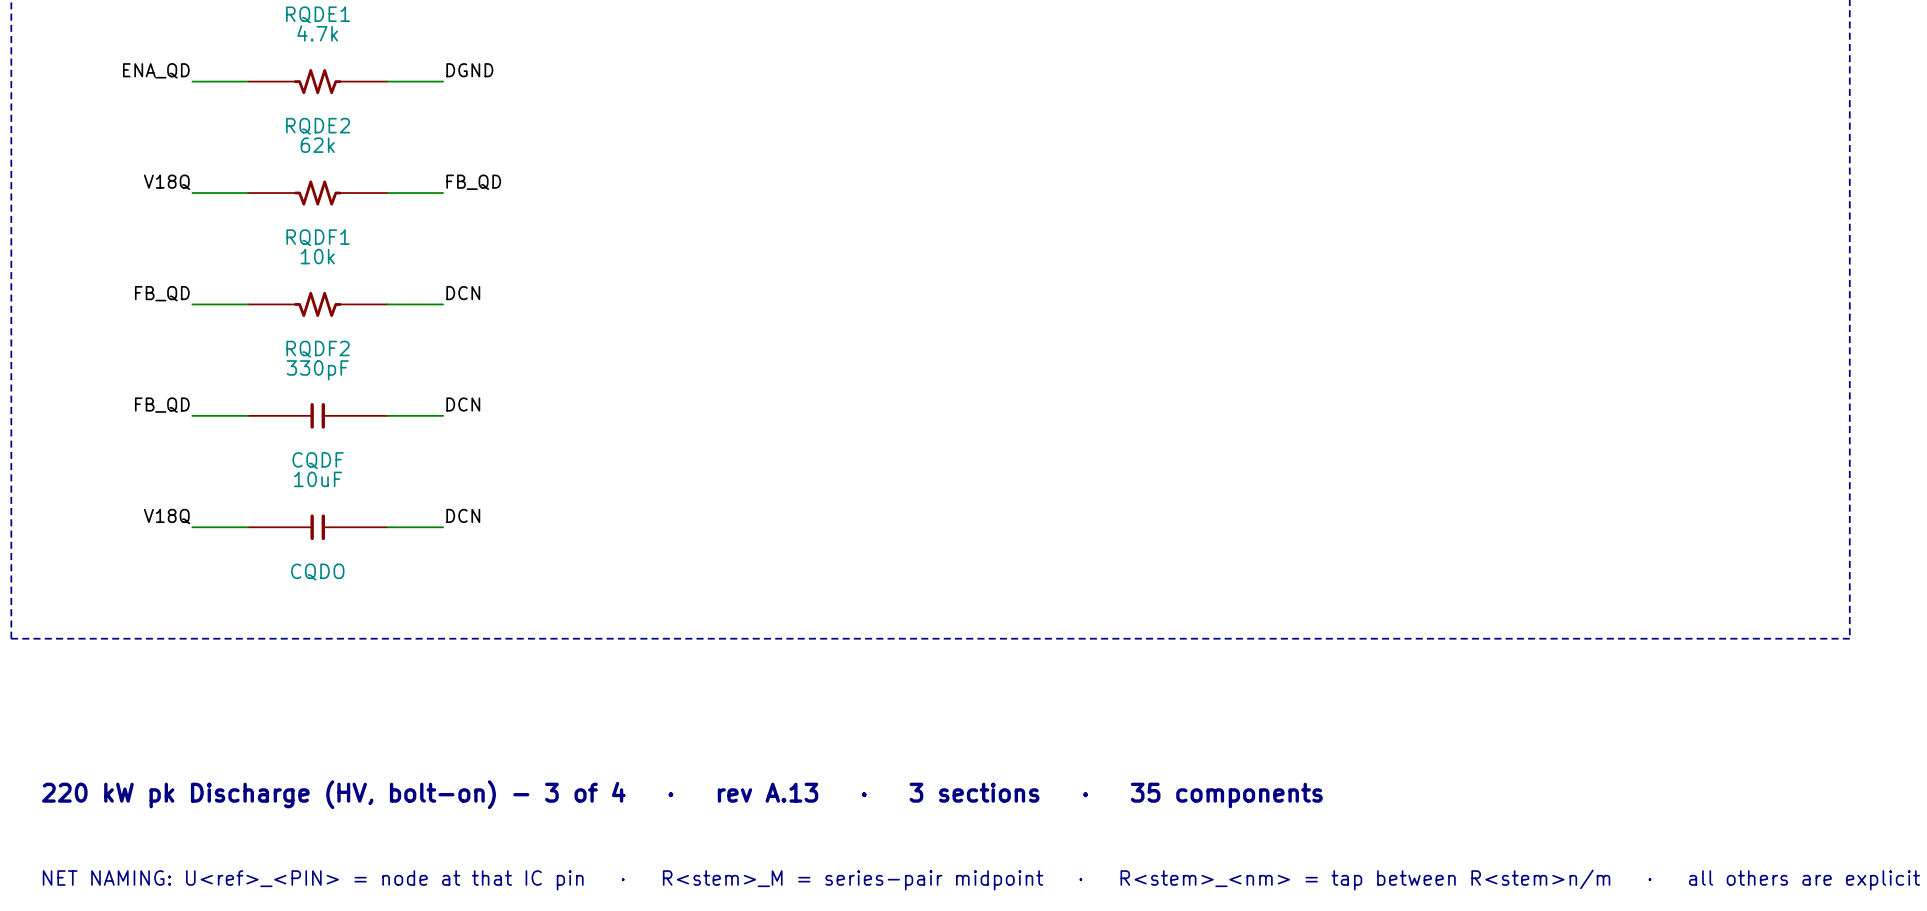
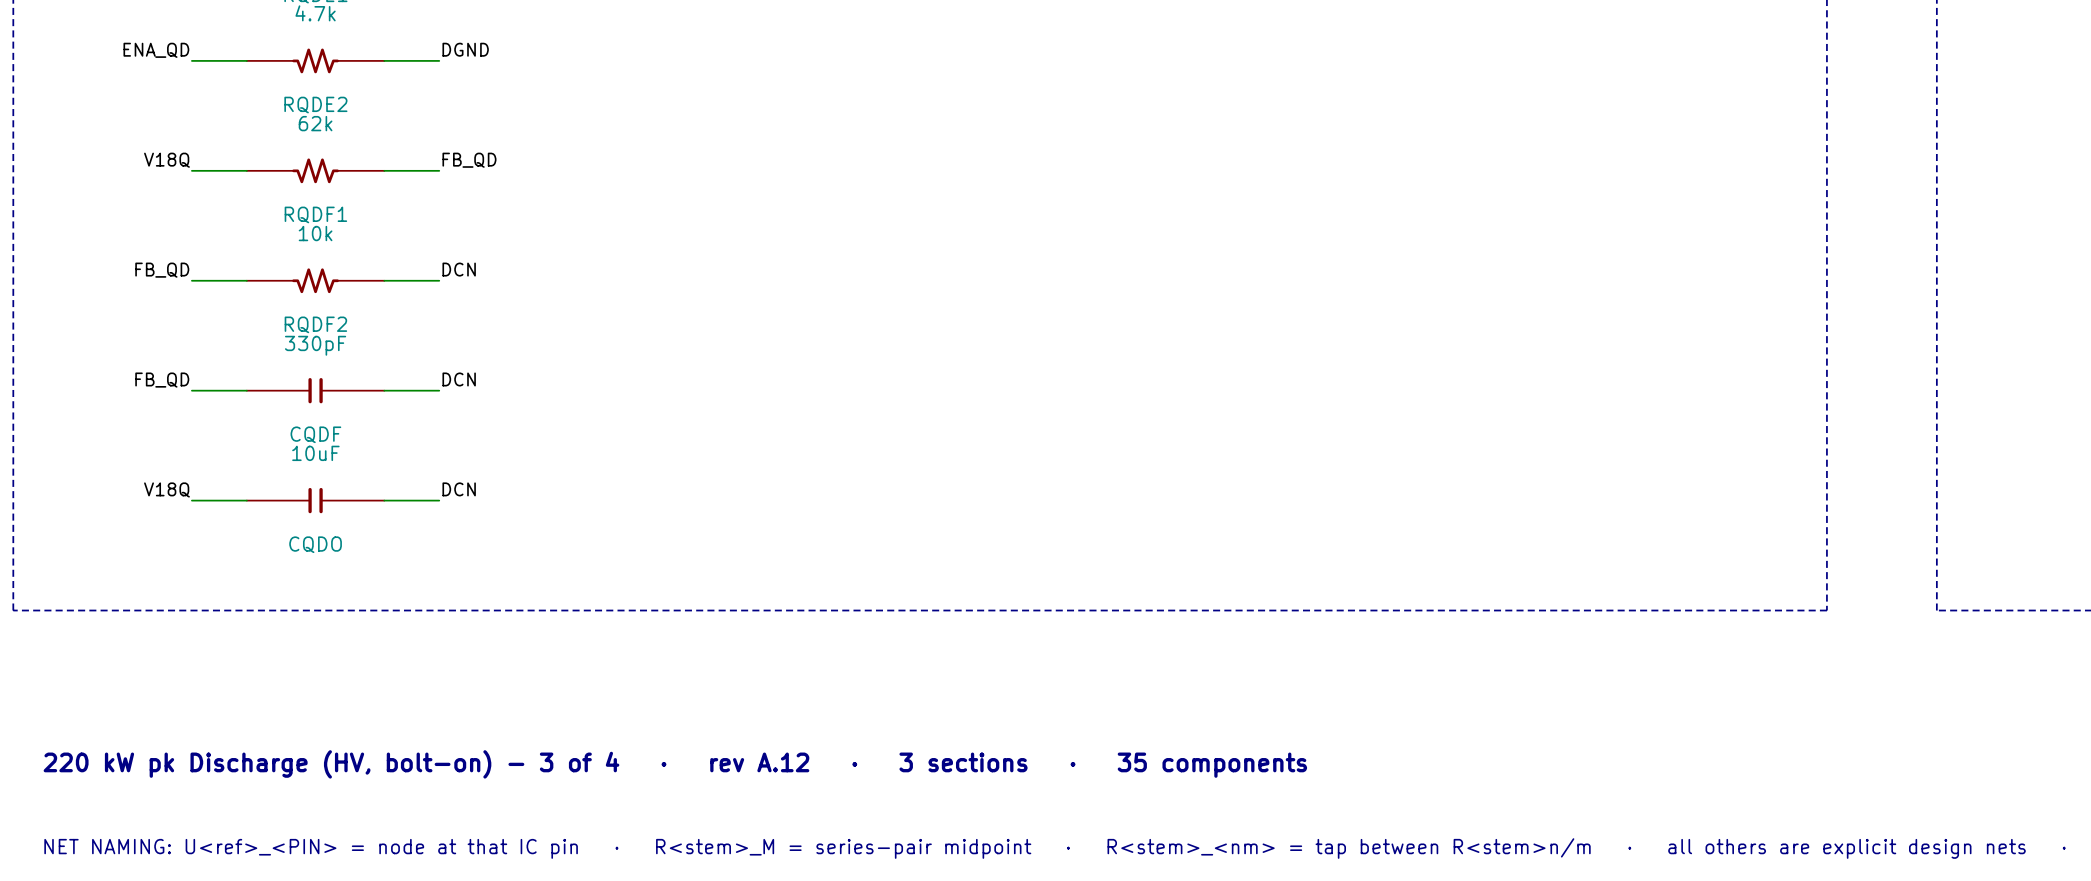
text: 220 kW pk Discharge (HV, bolt-on) - 3 of 4 · rev A.13 · 3 sections · 35 components (682, 794) -> 220 kW pk Discharge (HV, bolt-on) - 3 of 4 · rev A.12 · 3 sections · 35 components (675, 764)

